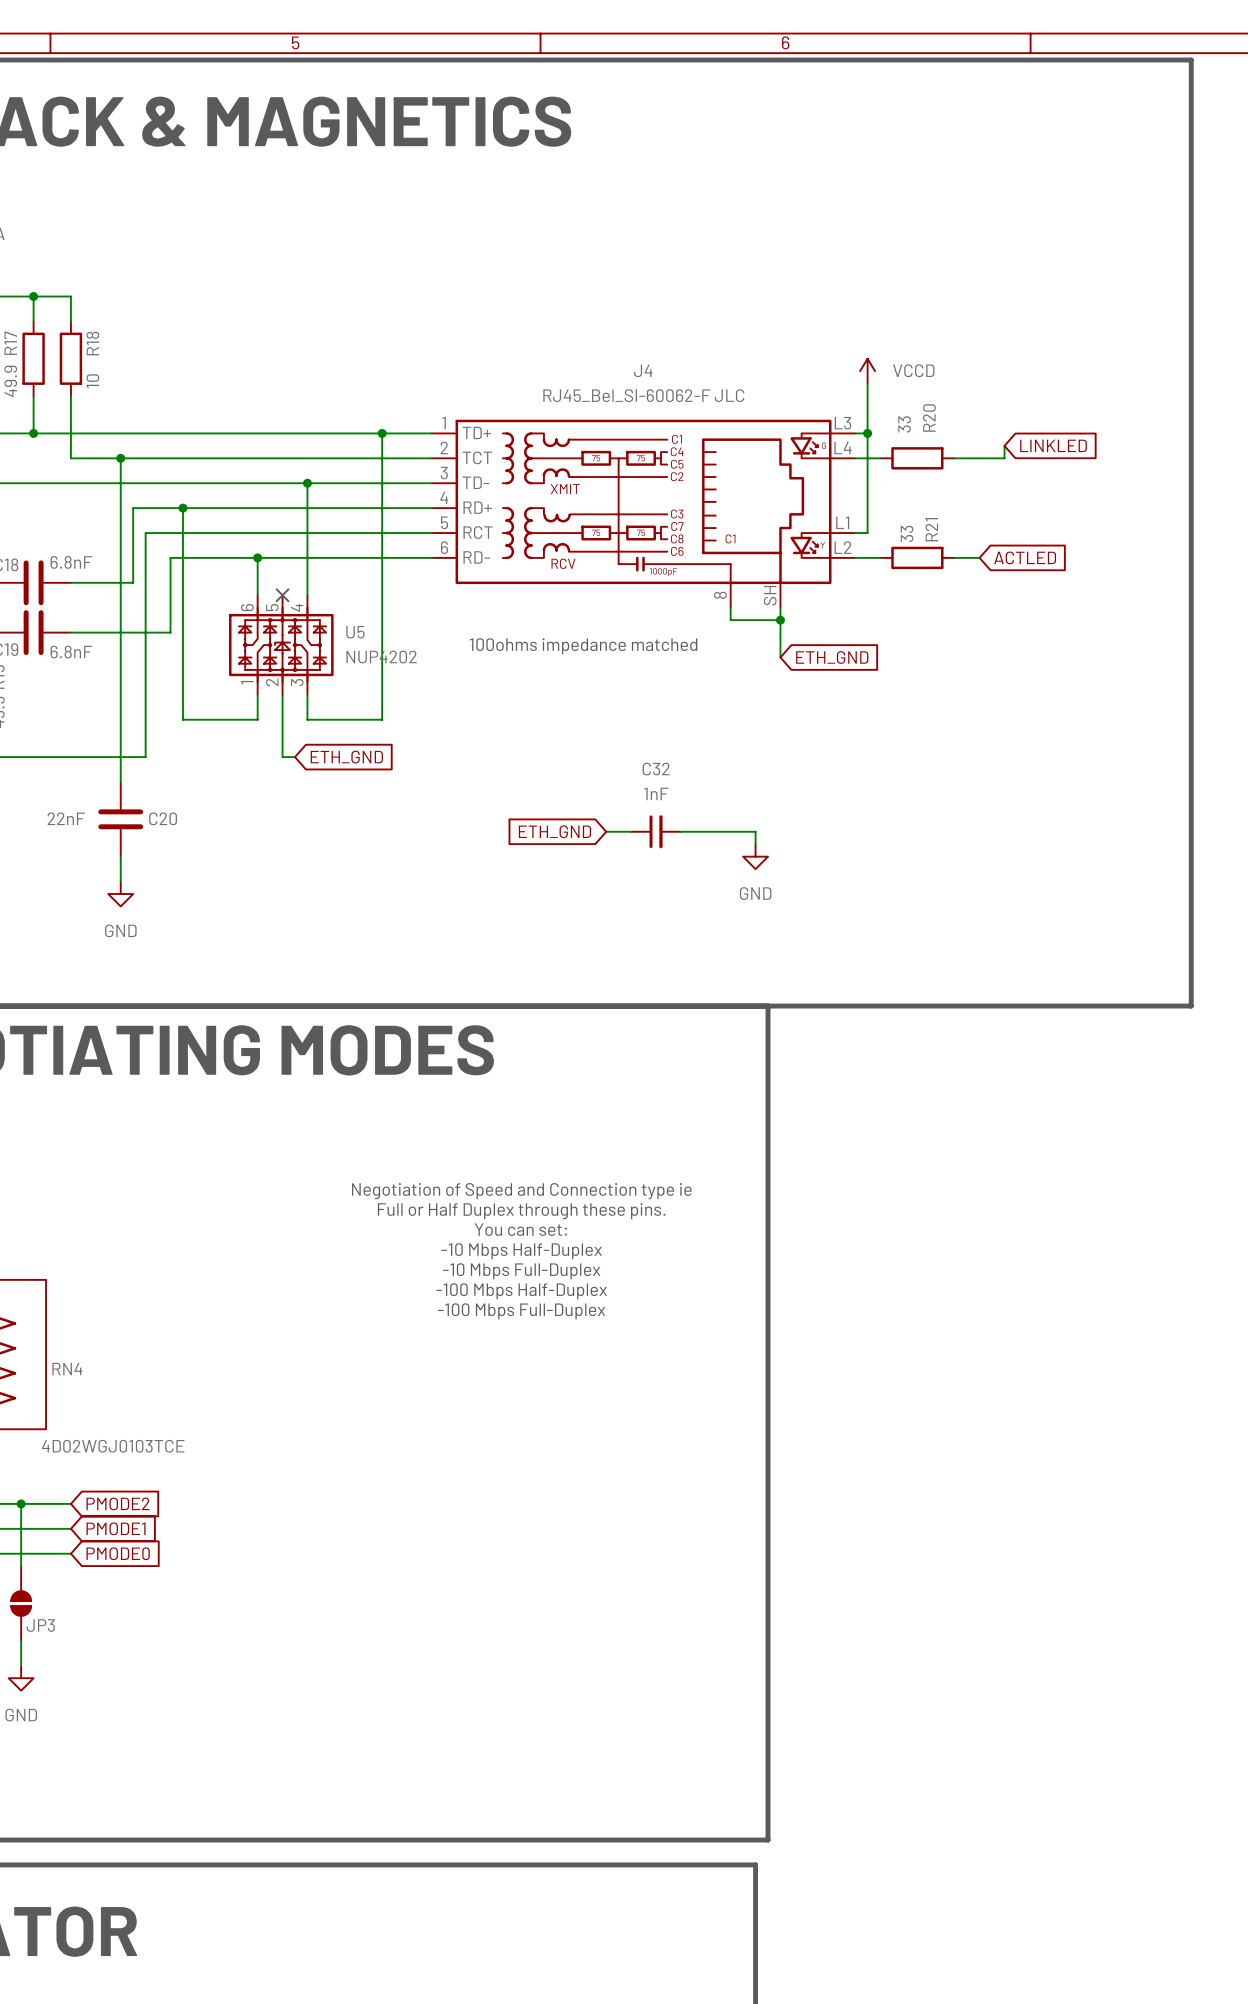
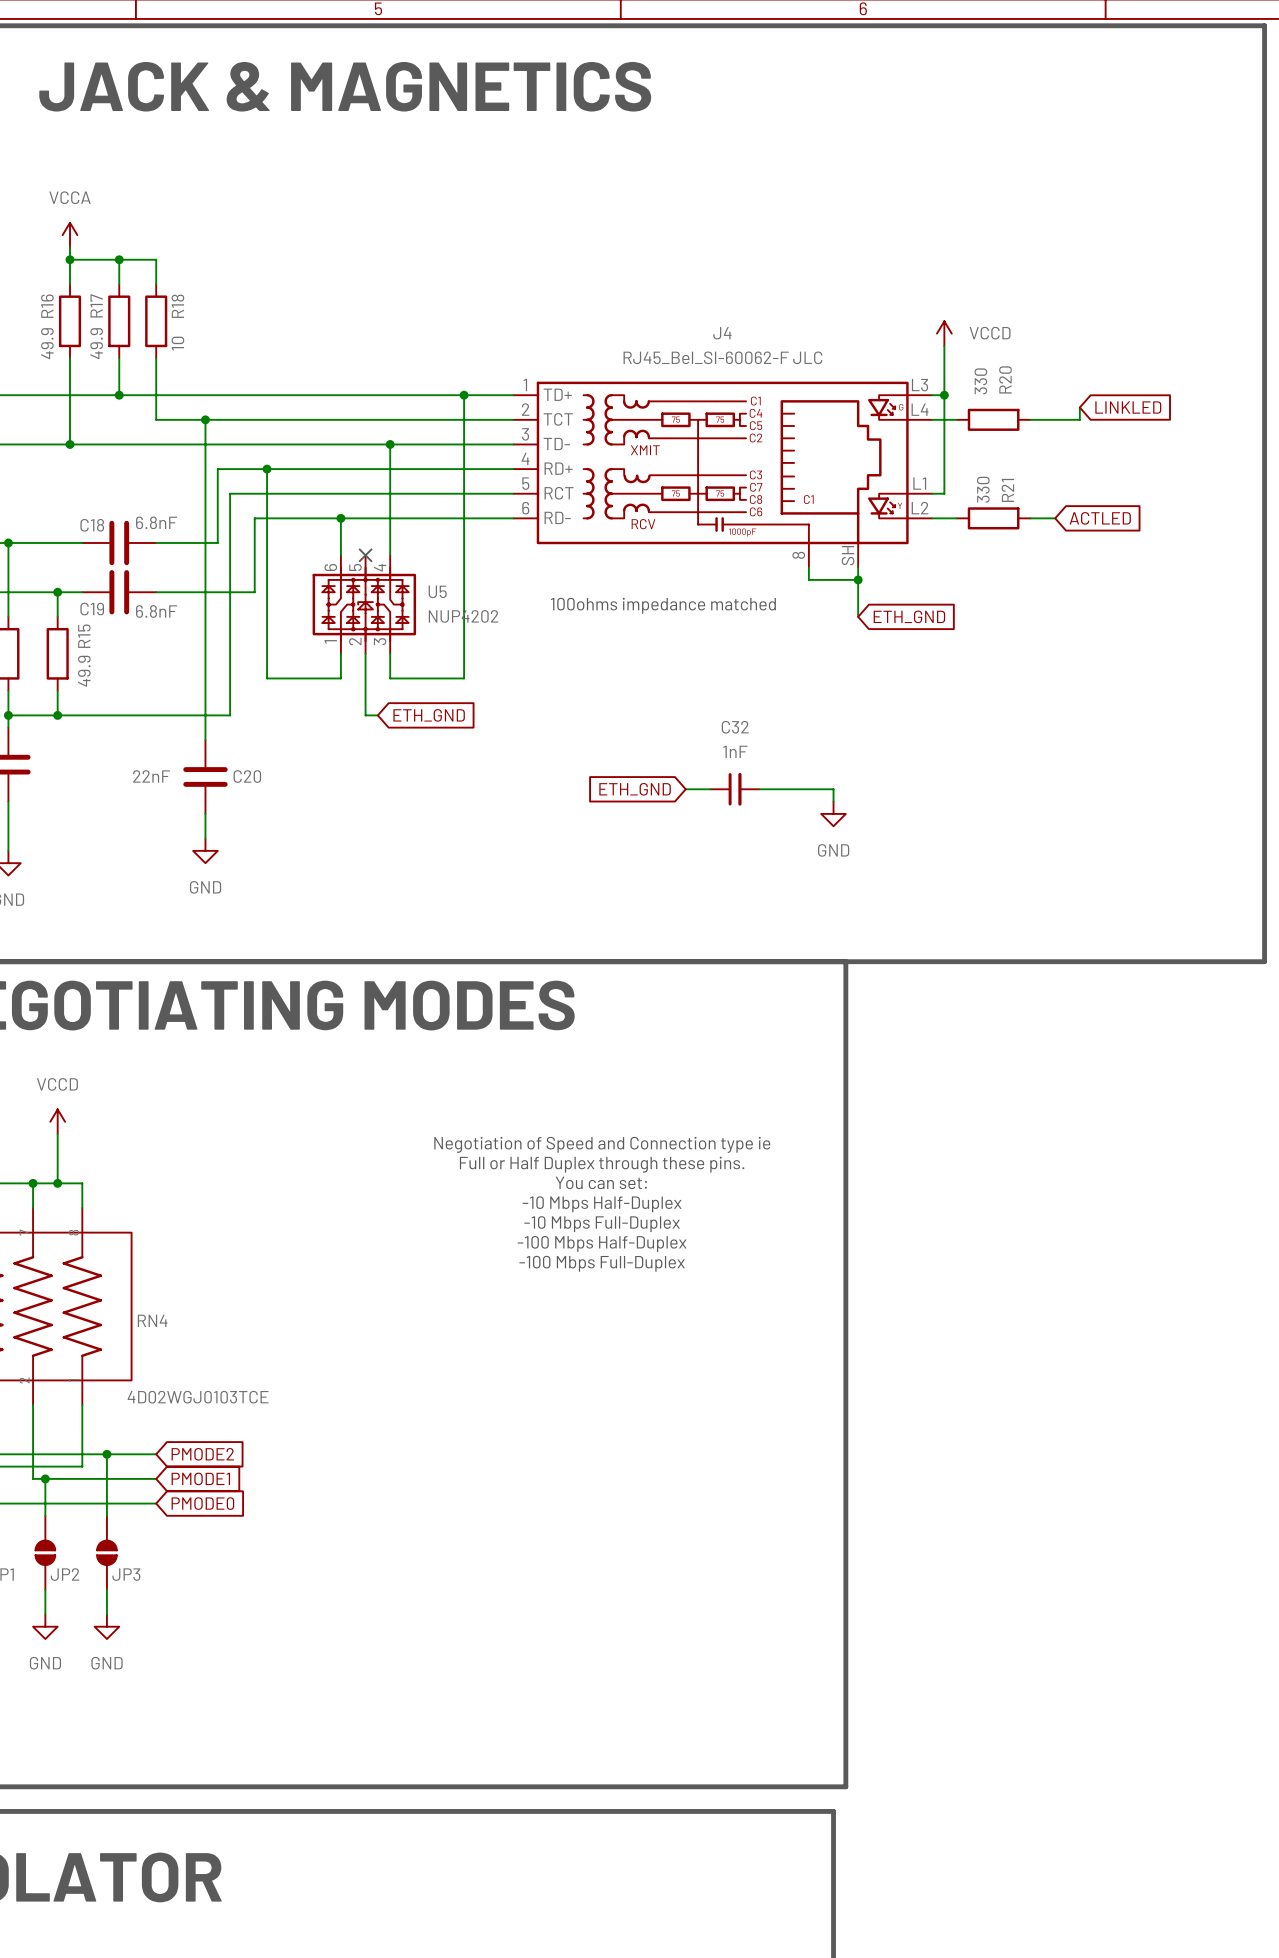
R20 value: 33 (904, 424) -> 330 (980, 381)
R21 value: 33 (907, 533) -> 330 (983, 489)

